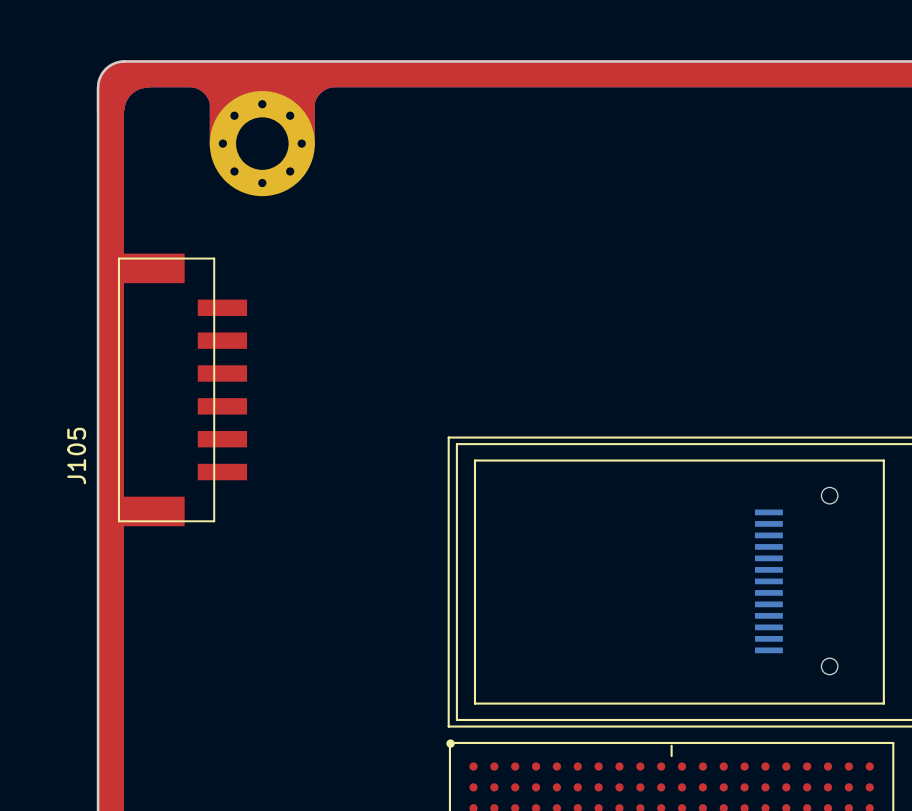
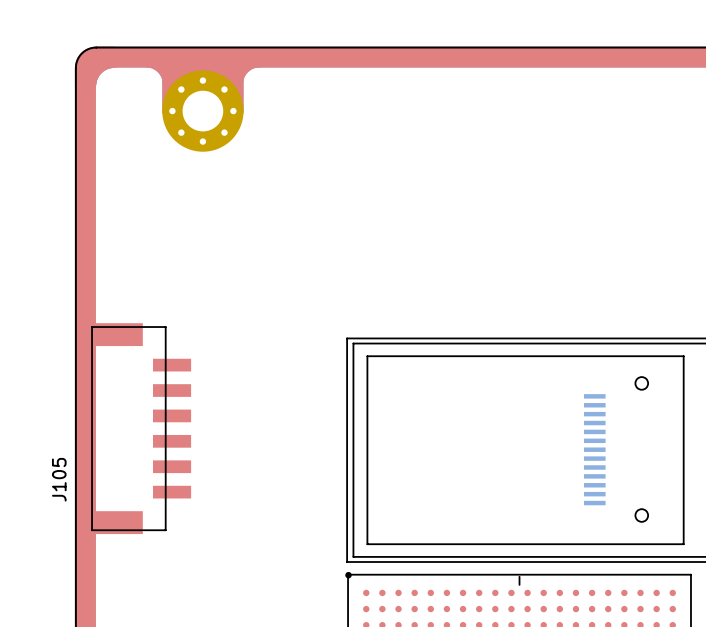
J105 position: (182, 389) -> (141, 428)

